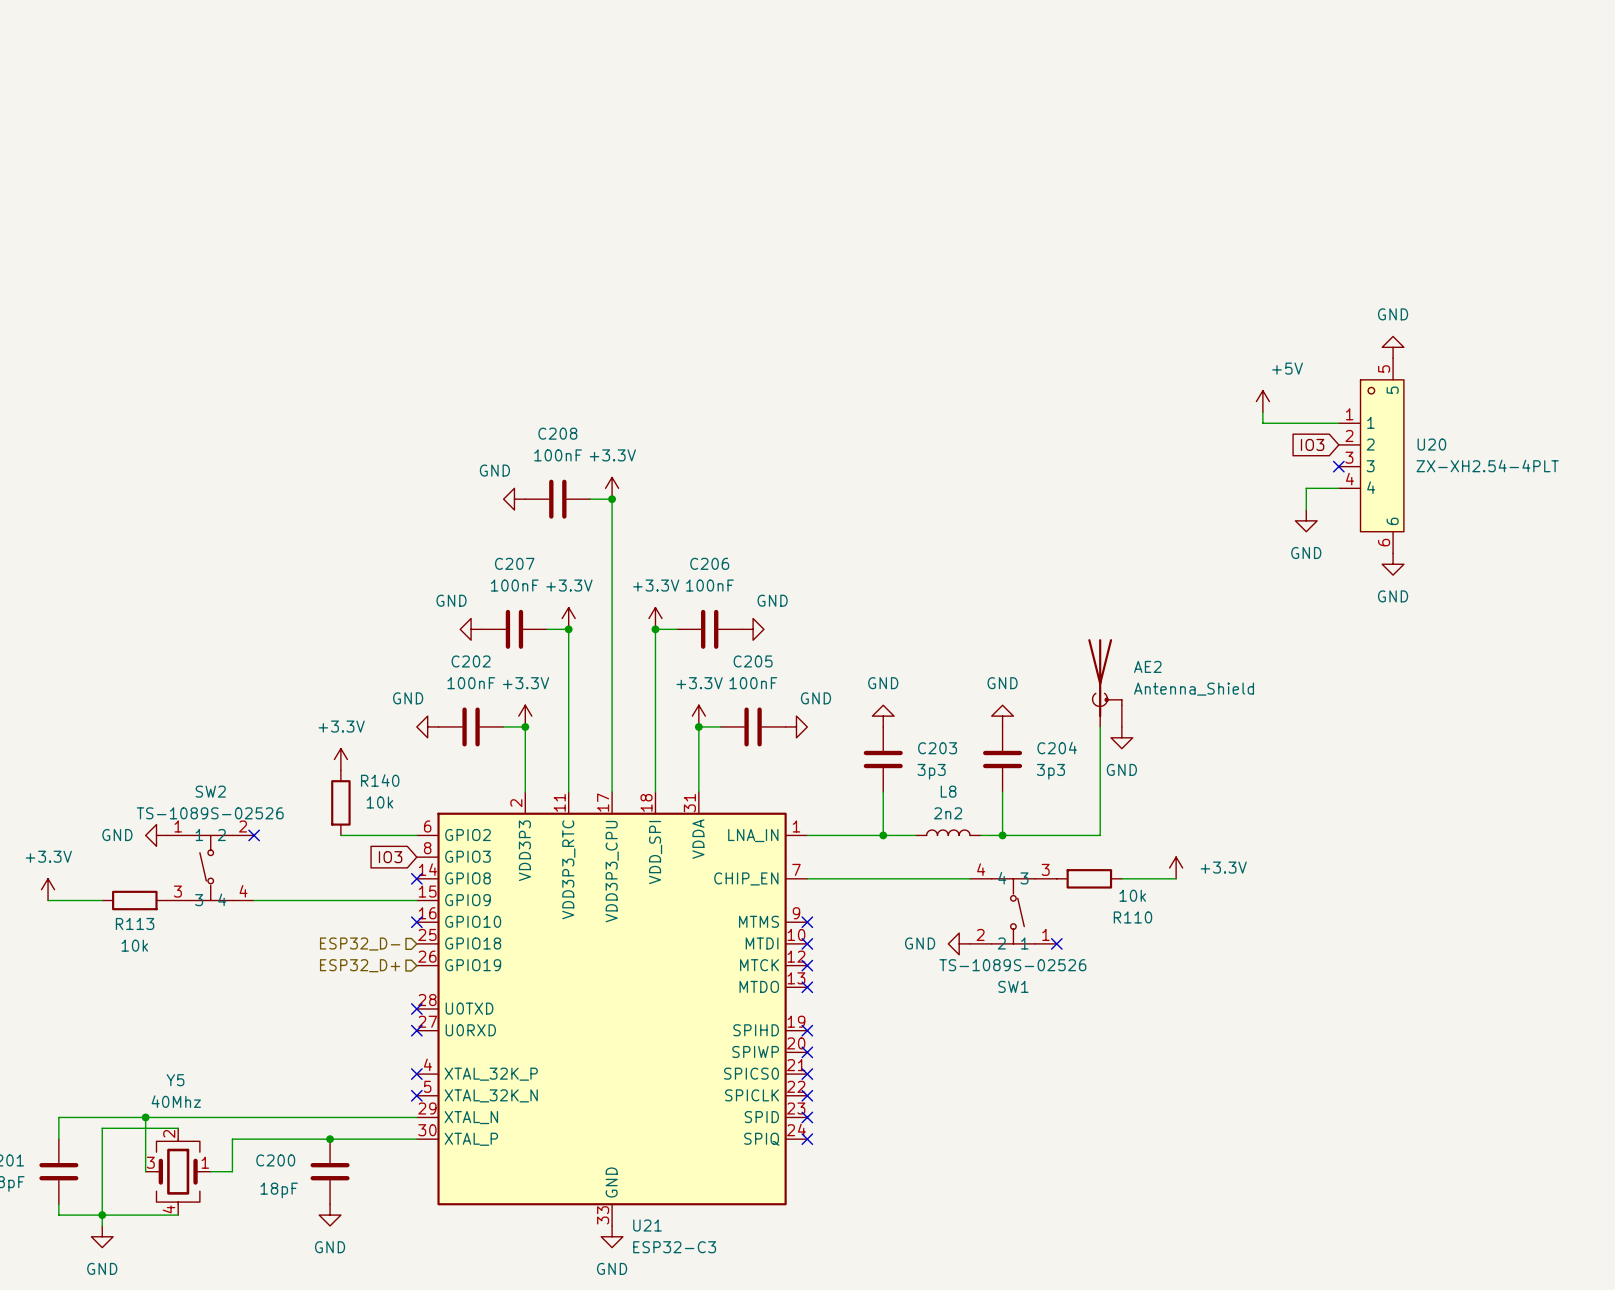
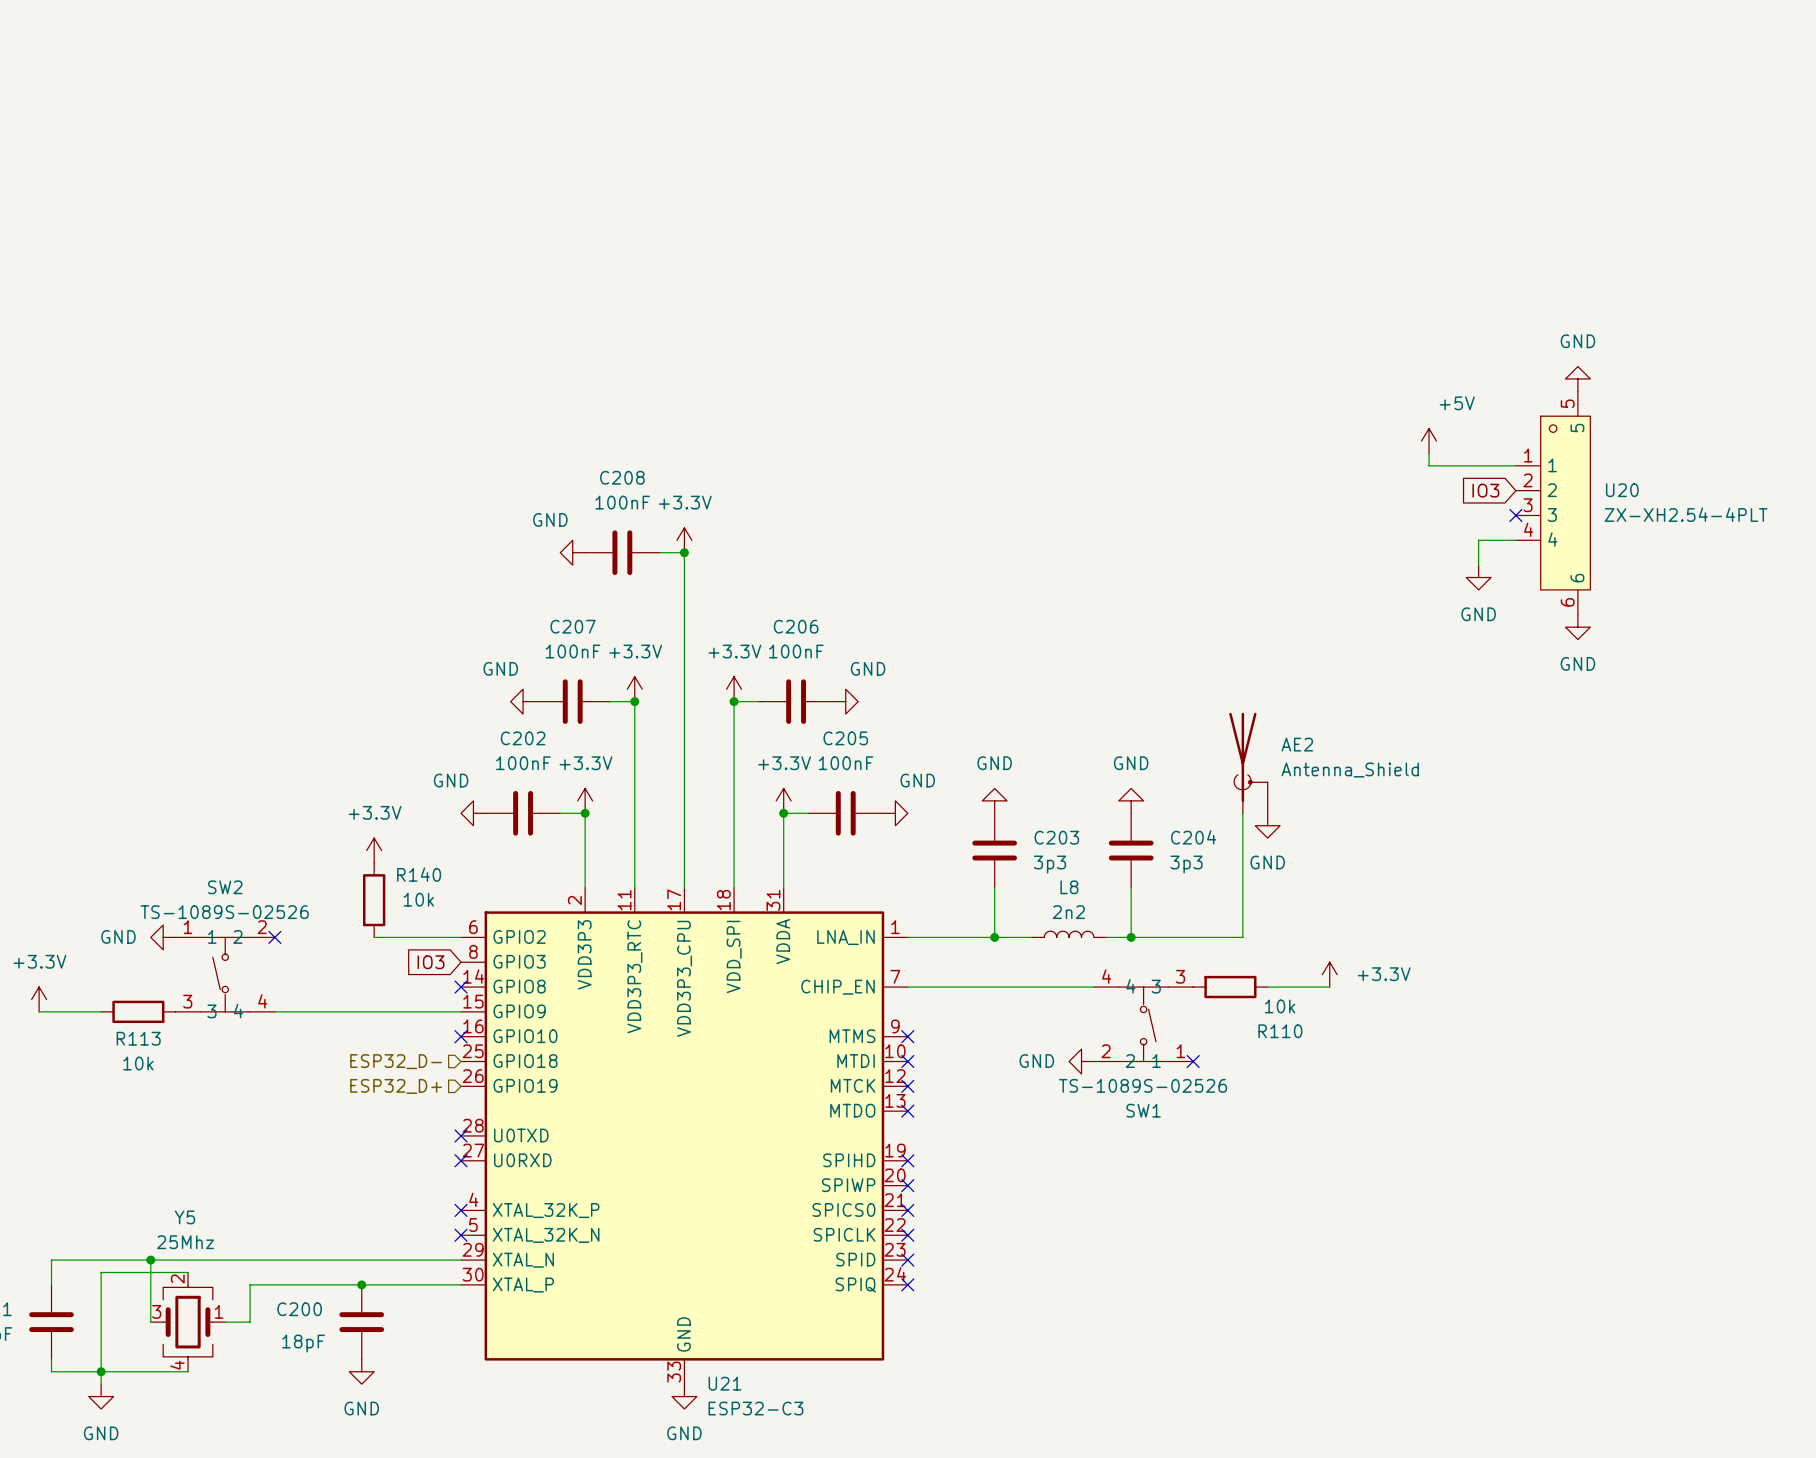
Y5 value: 40Mhz (176, 1101) -> 25Mhz (185, 1242)

